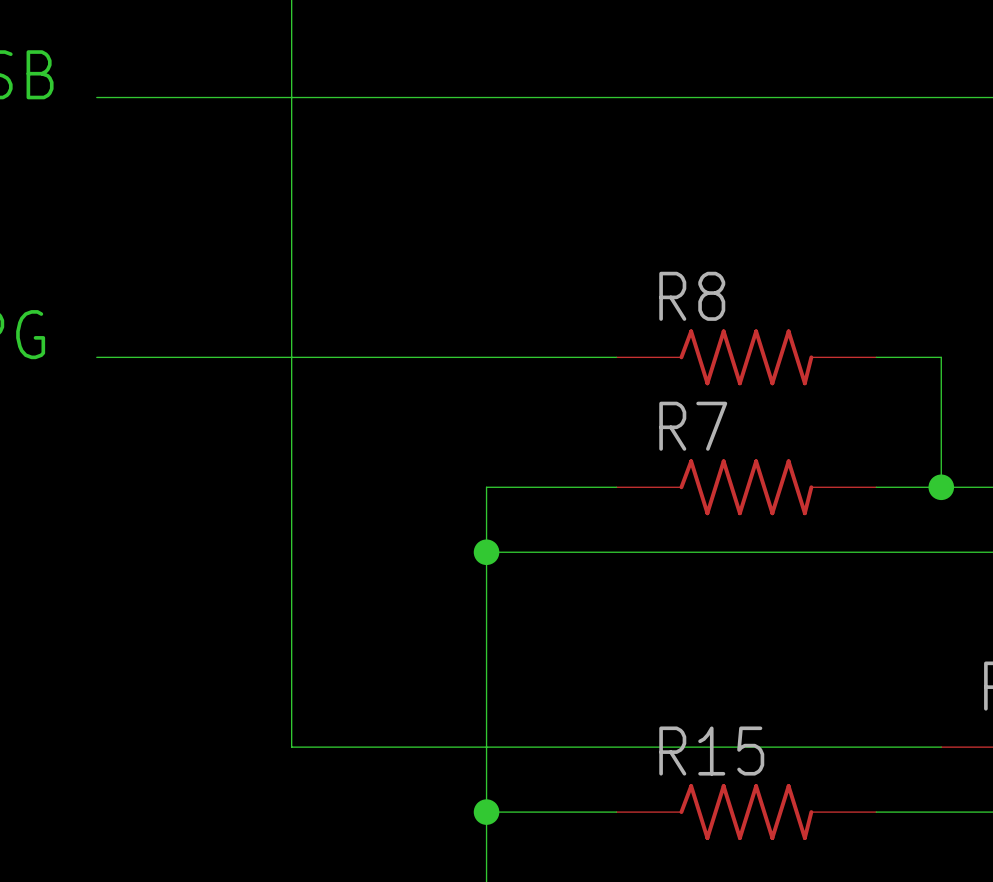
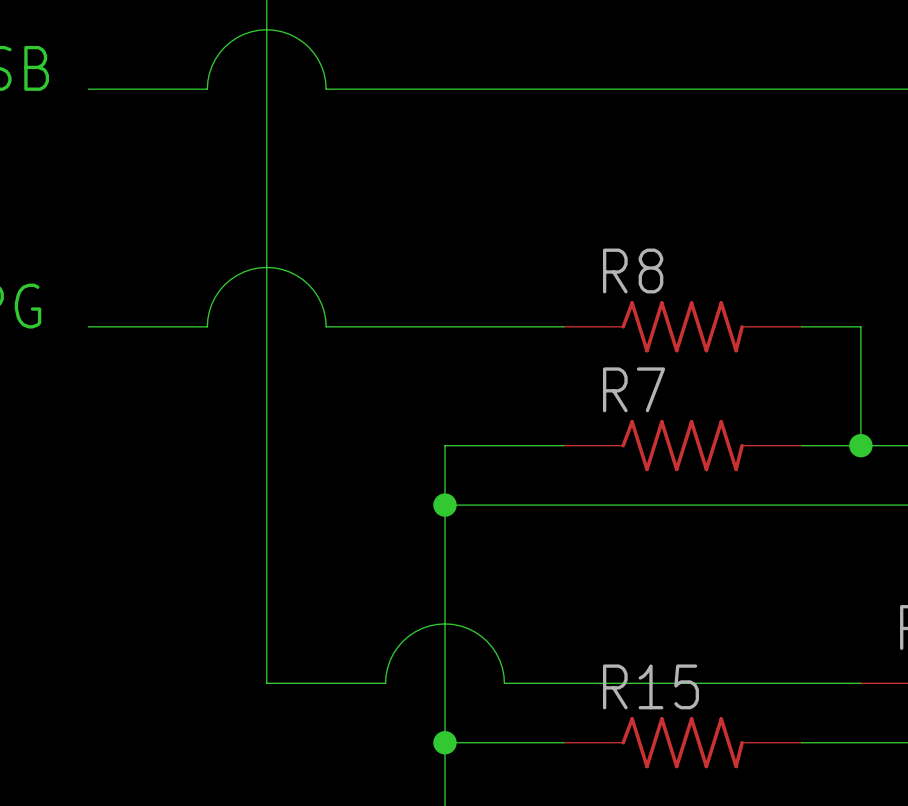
wire: (226, 97) (356, 97) -> (207, 89) (211, 66) (224, 47) (244, 34) (266, 29) (289, 34) (308, 47) (321, 66) (326, 89)
wire: (226, 357) (356, 357) -> (207, 326) (211, 304) (224, 284) (244, 271) (266, 267) (289, 271) (308, 284) (321, 304) (326, 326)
wire: (421, 747) (551, 747) -> (385, 683) (390, 660) (402, 641) (422, 628) (445, 623) (467, 628) (487, 641) (499, 660) (504, 683)

